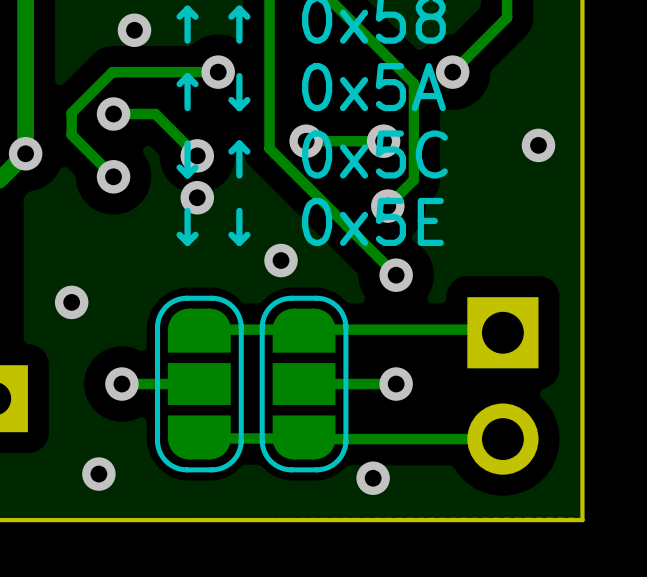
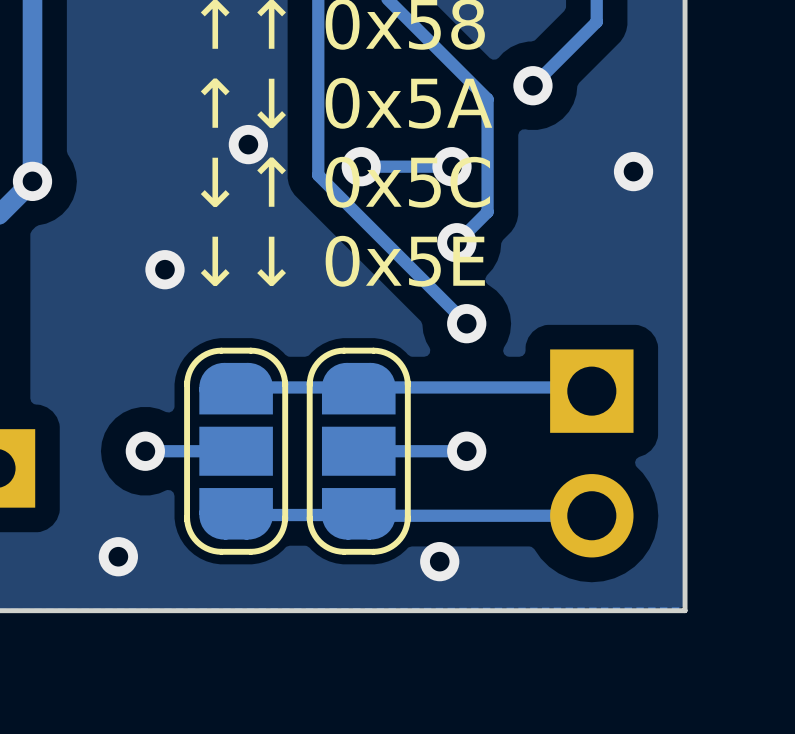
via: (134, 30) -> none
track: (218, 72) (112, 72) (71, 112) (71, 134) (113, 176) -> none
via: (218, 72) -> none
track: (113, 113) (155, 113) (197, 155) -> none
via: (113, 113) -> none
via position: (197, 155) -> (248, 144)
via: (113, 176) -> none
via: (197, 197) -> none
via: none -> (164, 269)
via: (281, 260) -> none
via: (71, 302) -> none

